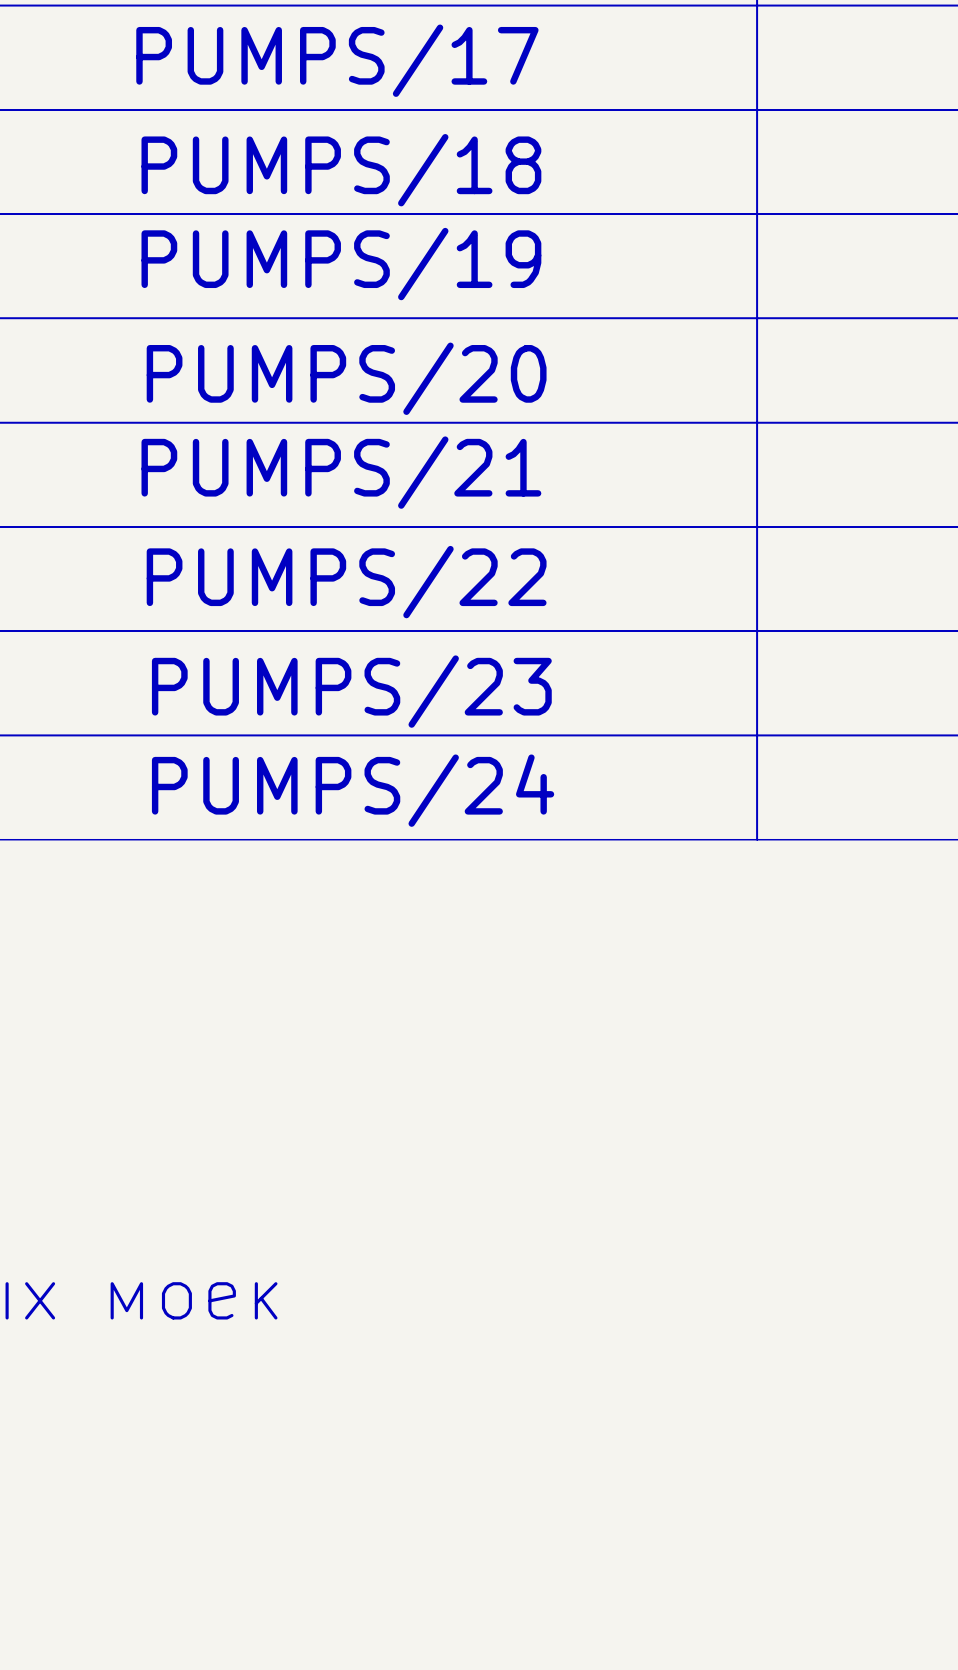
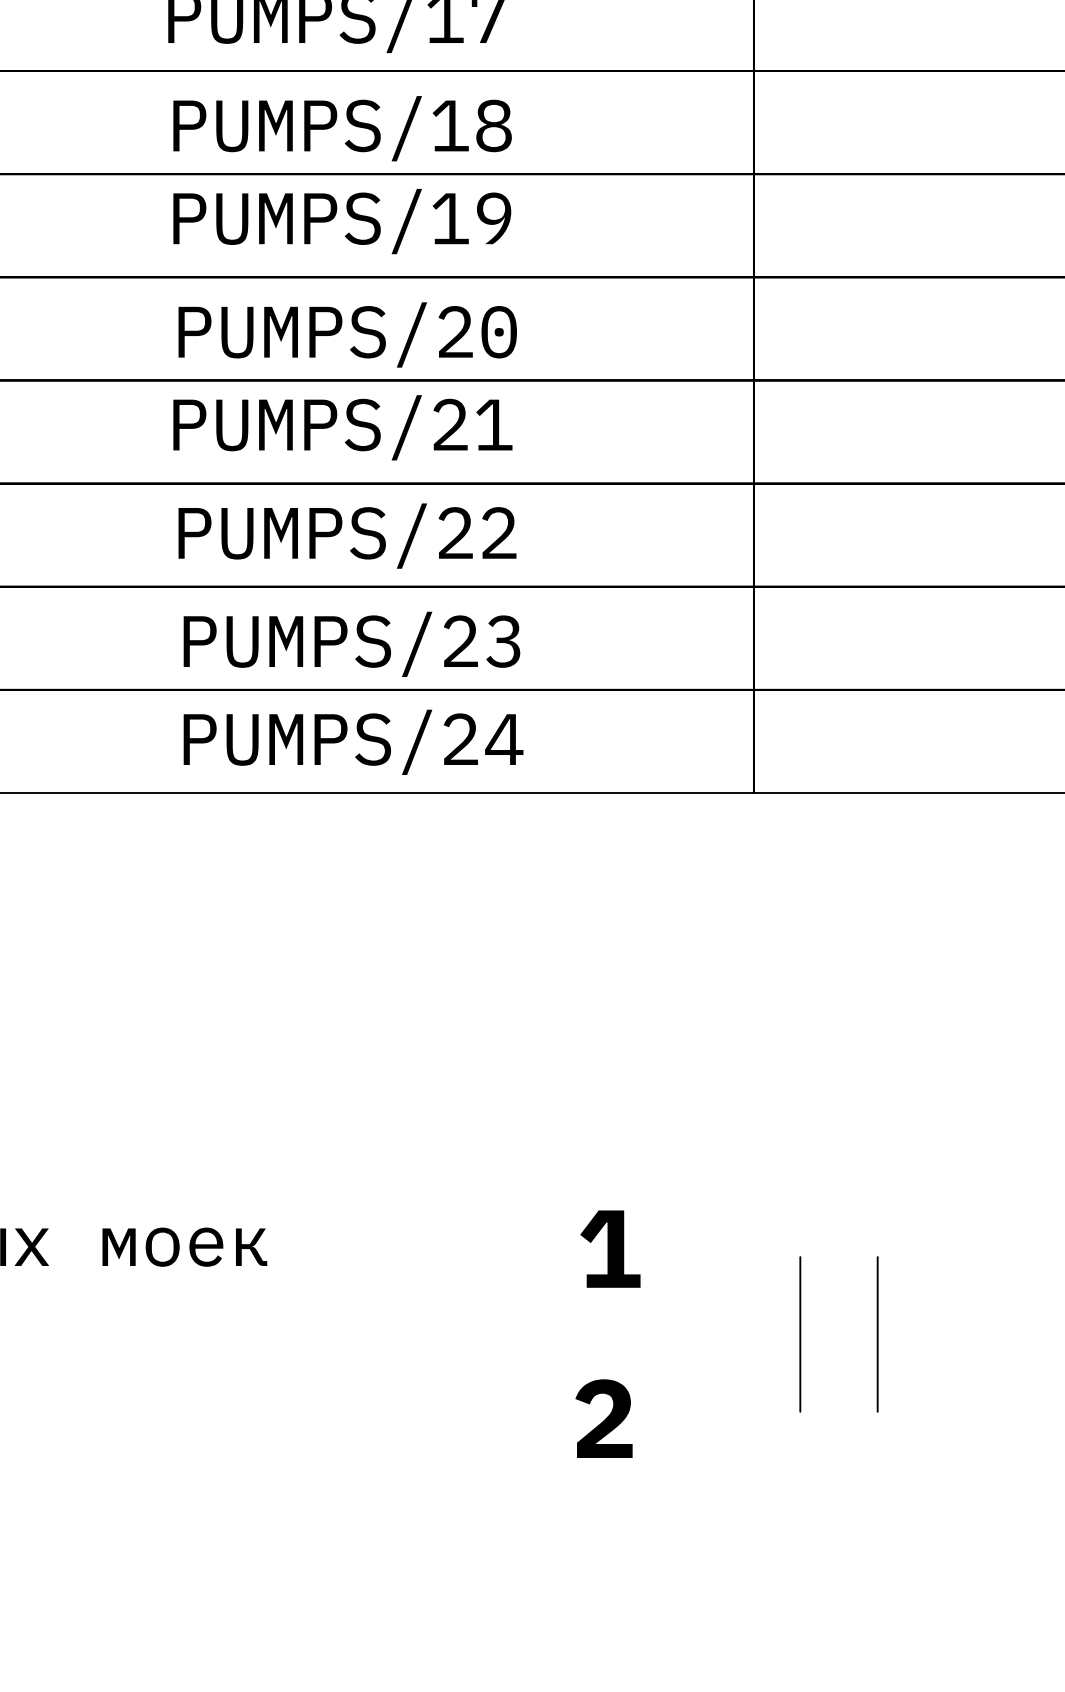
text: none -> 1 (610, 1249)
line: none -> (800, 1257) (800, 1411)
line: none -> (877, 1257) (877, 1411)
text: none -> 2 (603, 1418)

